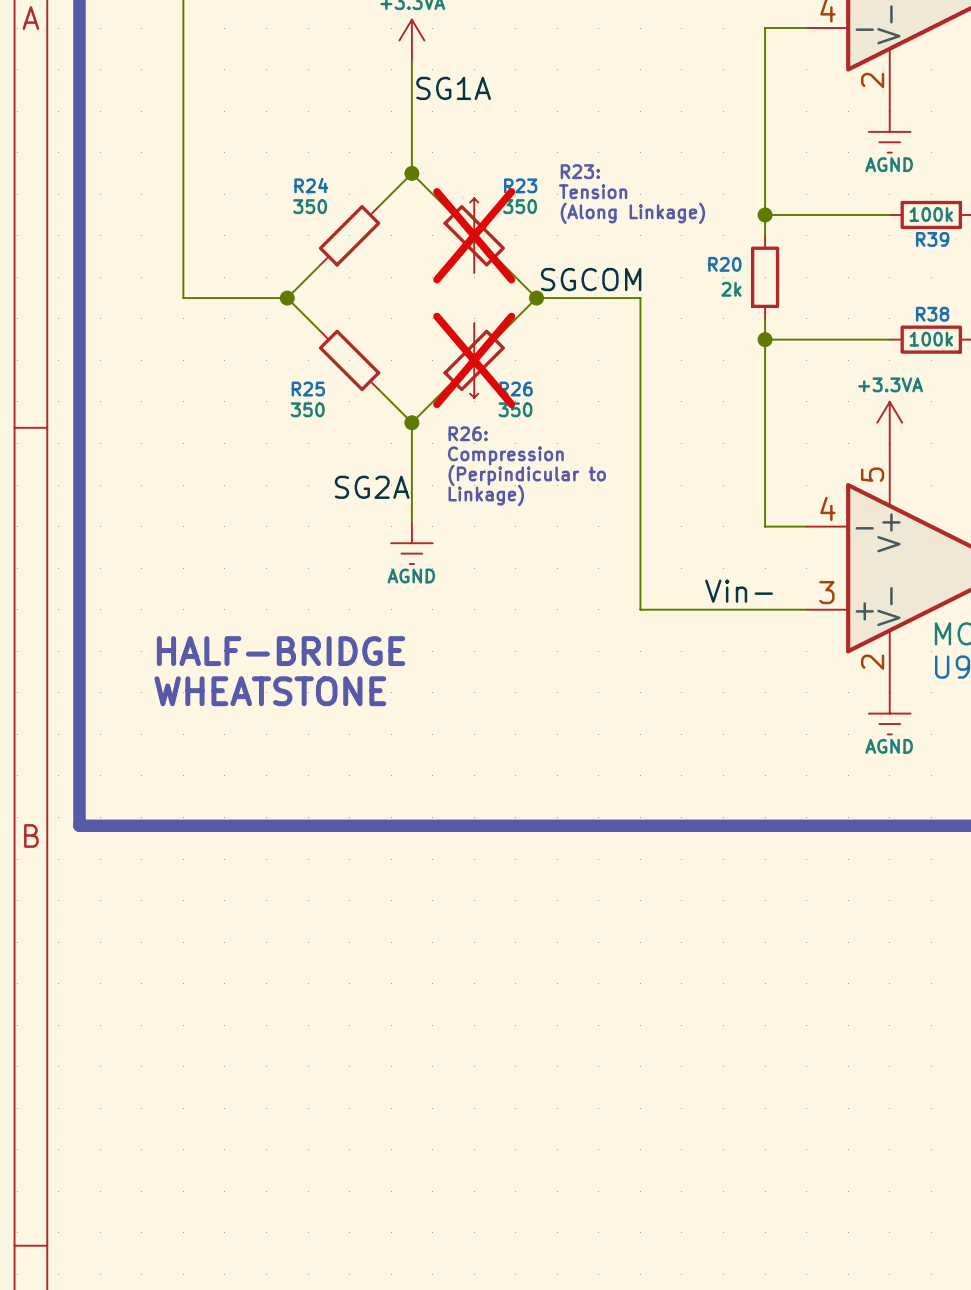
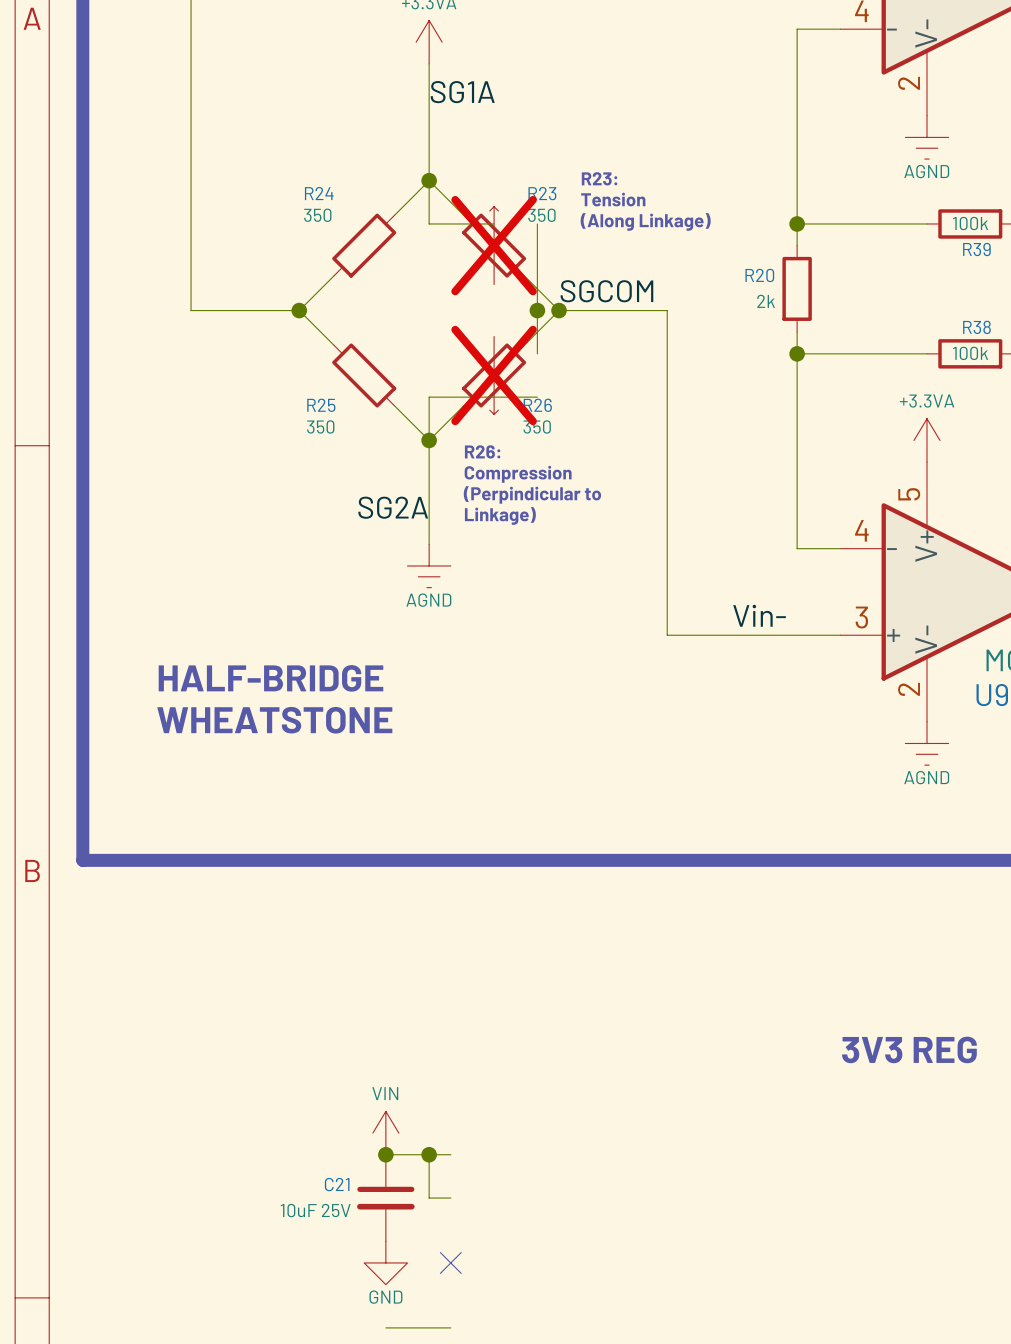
wire: none -> (429, 180) (429, 223) (494, 223)
wire: none -> (537, 223) (537, 353)
junction: none -> (537, 310)
wire: none -> (537, 397) (429, 397) (429, 440)
text: none -> 3V3 REG (909, 1049)
power symbol: none -> VIN (385, 1133)
wire: none -> (385, 1154) (450, 1154)
junction: none -> (385, 1154)
wire: none -> (429, 1154) (429, 1198) (450, 1198)
junction: none -> (429, 1154)
C21: none -> 10uF 25V (385, 1198)
power symbol: none -> GND (385, 1262)
no-connect mark: none -> (450, 1262)
wire: none -> (385, 1327) (450, 1327)

